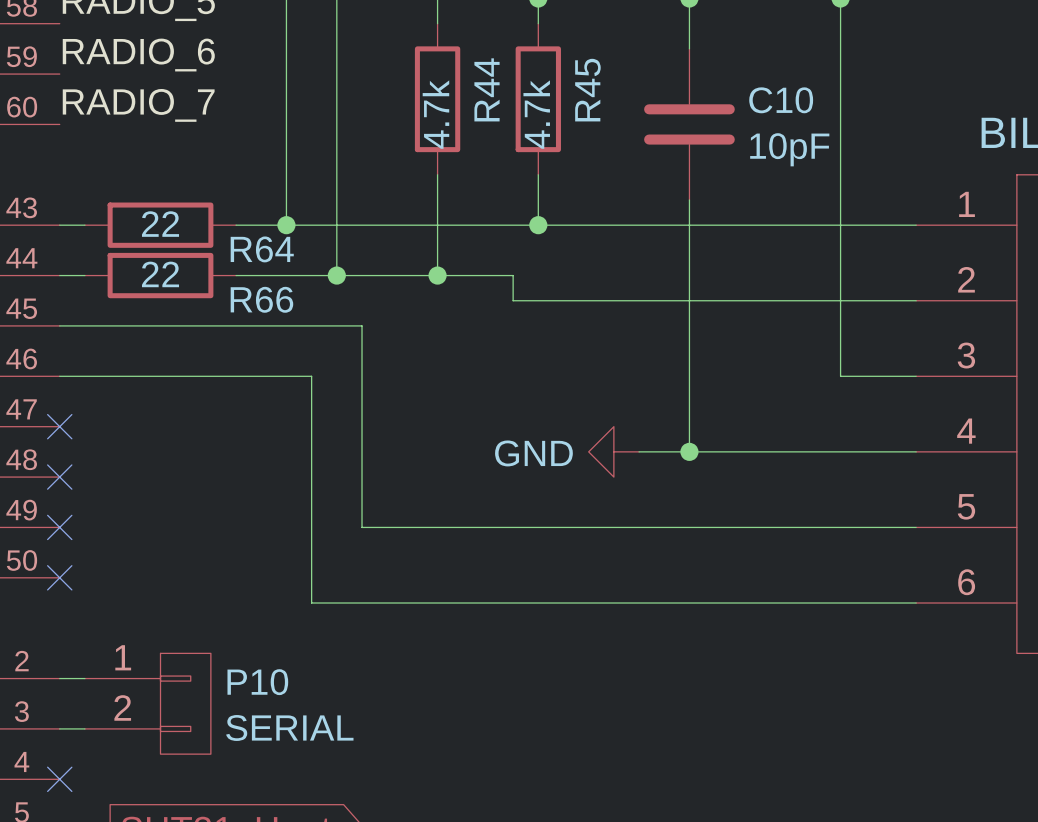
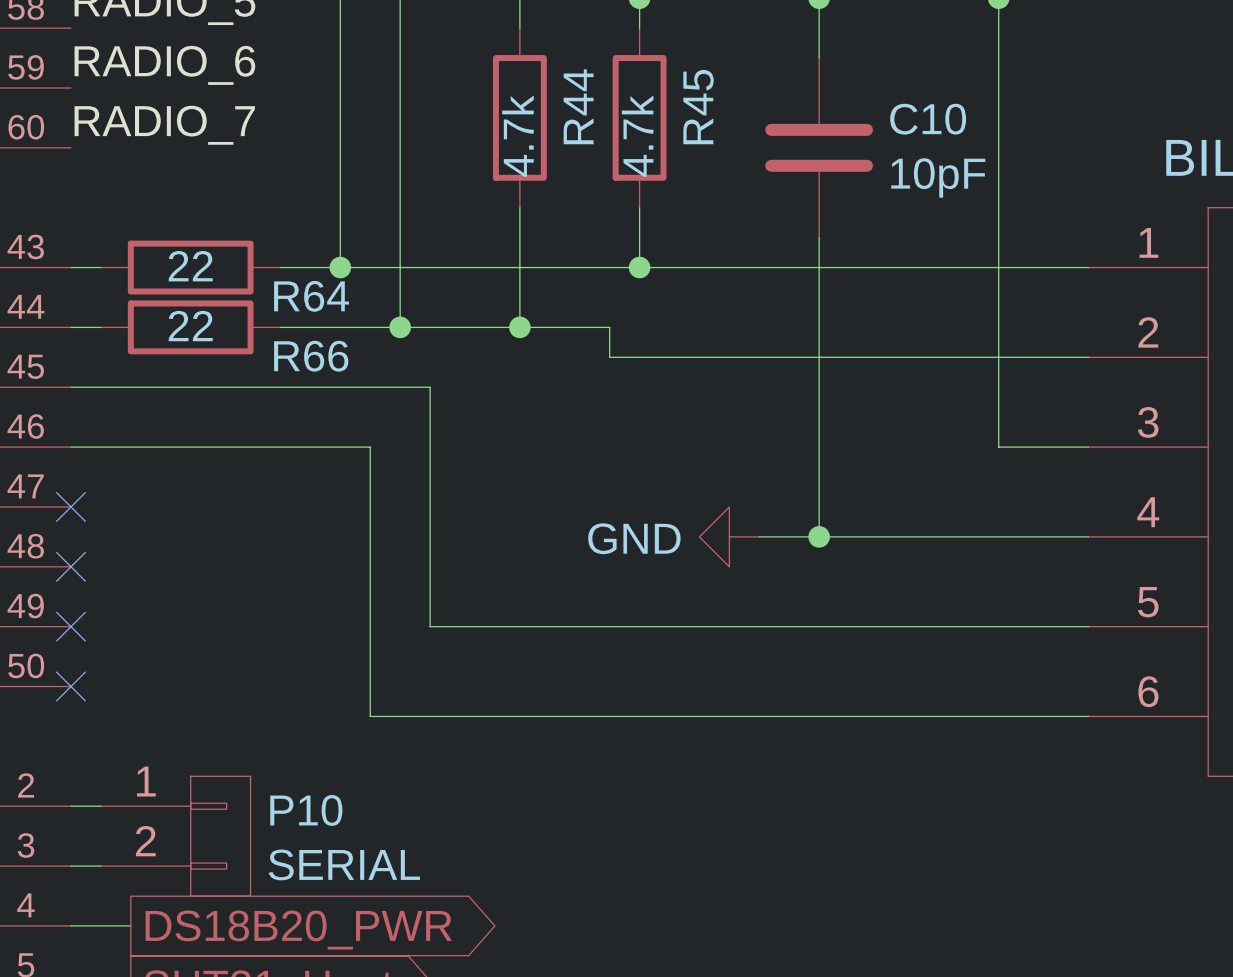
wire: none -> (70, 925) (130, 925)
no-connect mark: (59, 779) -> none
global label: none -> DS18B20_PWR (298, 930)

